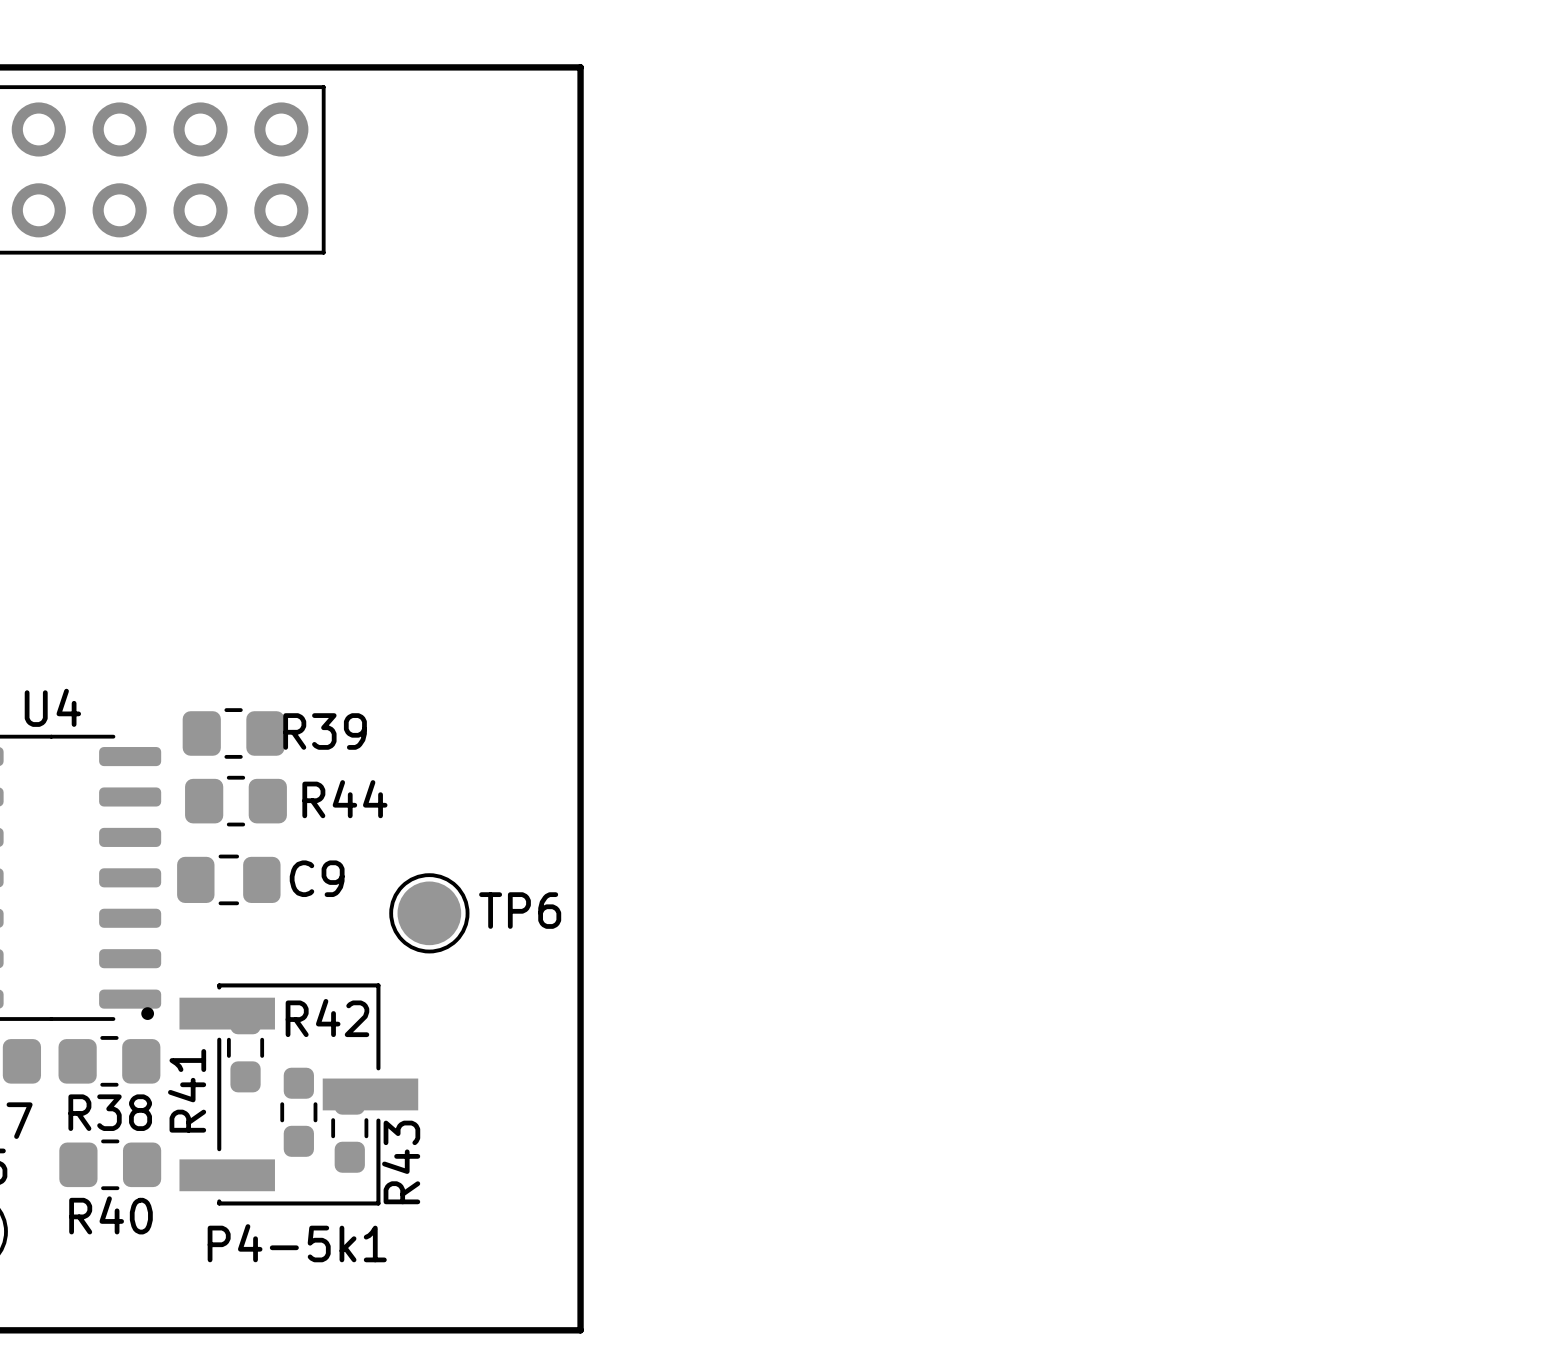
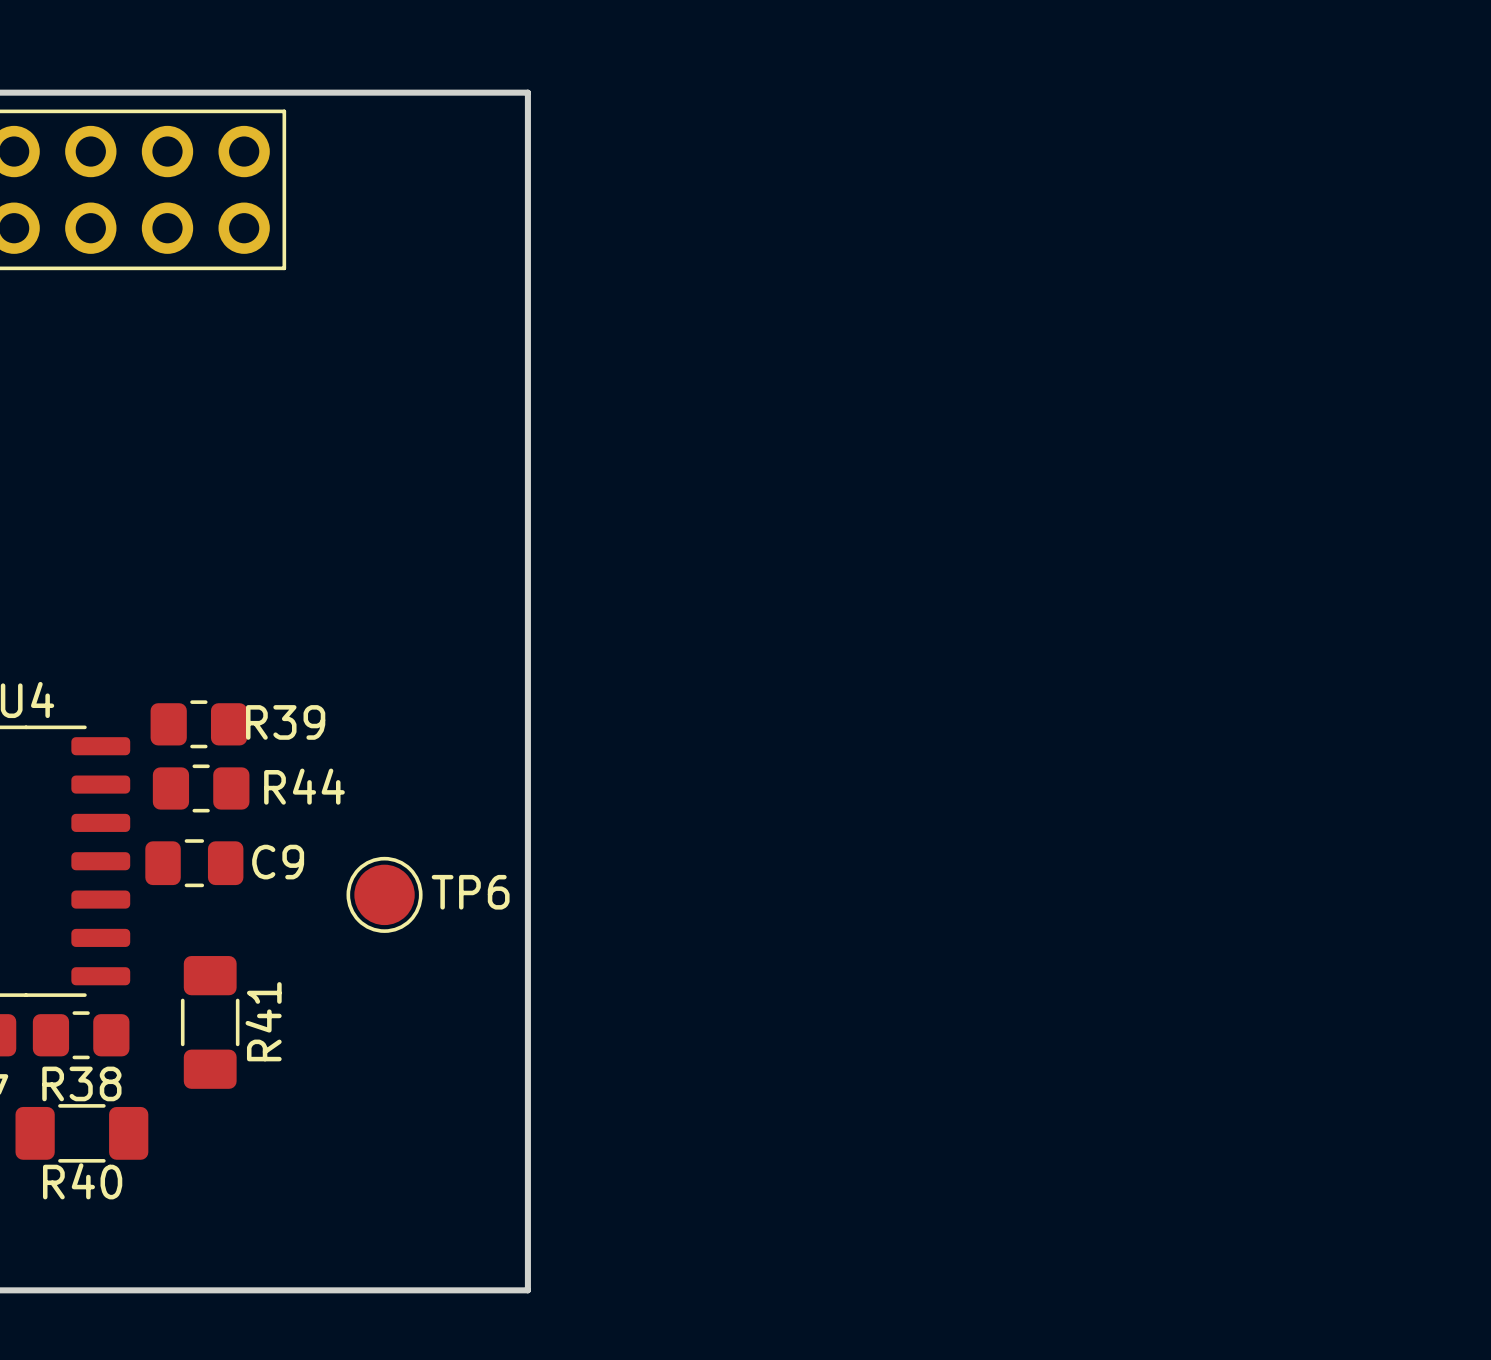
R41 footprint: [226, 1003, 265, 1093] -> [180, 956, 240, 1089]
R41 name position: R41 (187, 1090) -> R41 (263, 1021)
P4-5k1: (279, 1094) -> none
R42: (298, 1112) -> none
R43: (349, 1128) -> none
R40 footprint: [59, 1139, 162, 1191] -> [15, 1104, 149, 1163]

